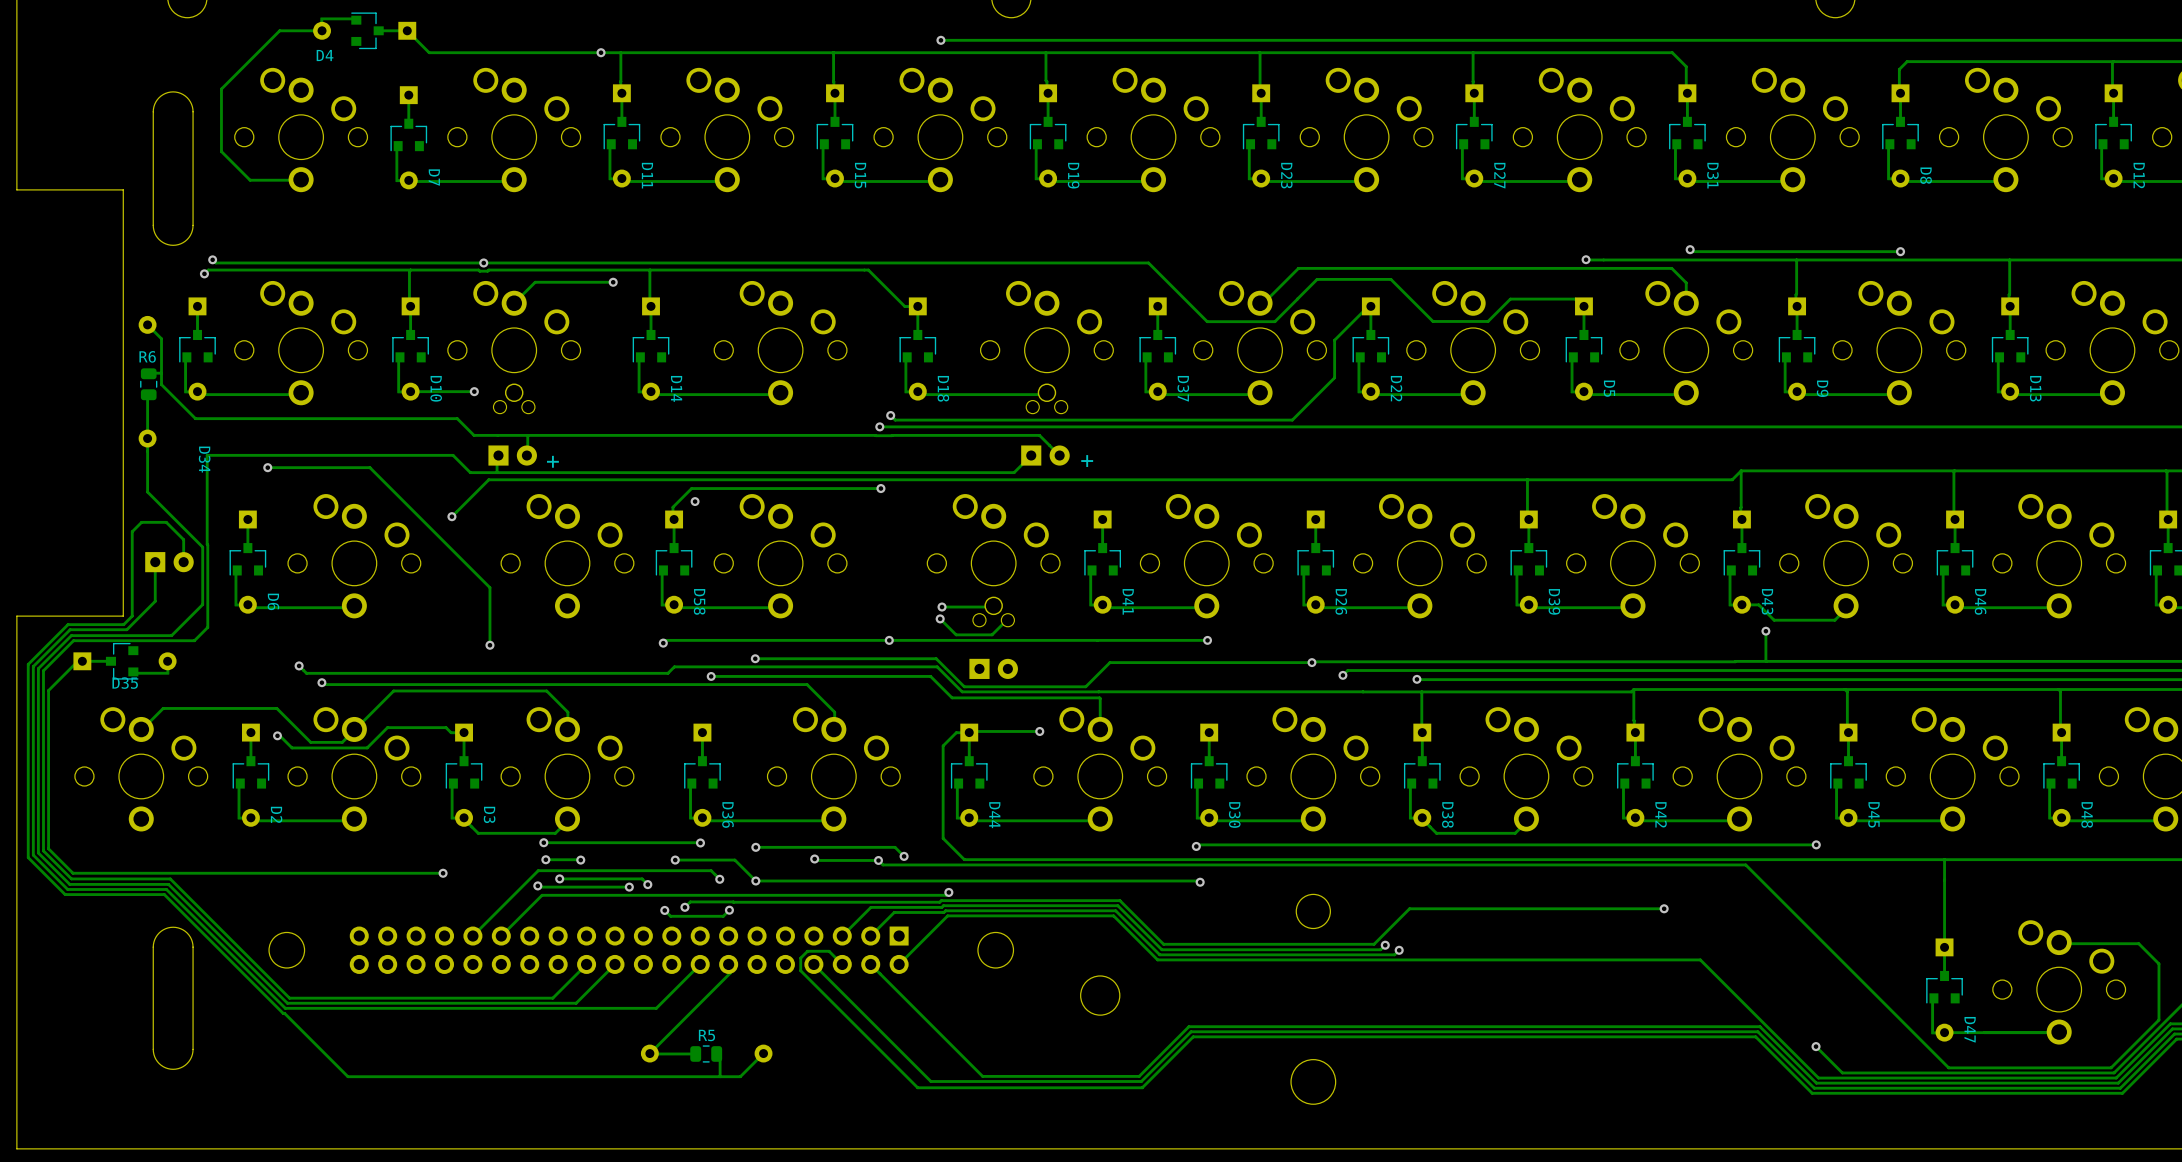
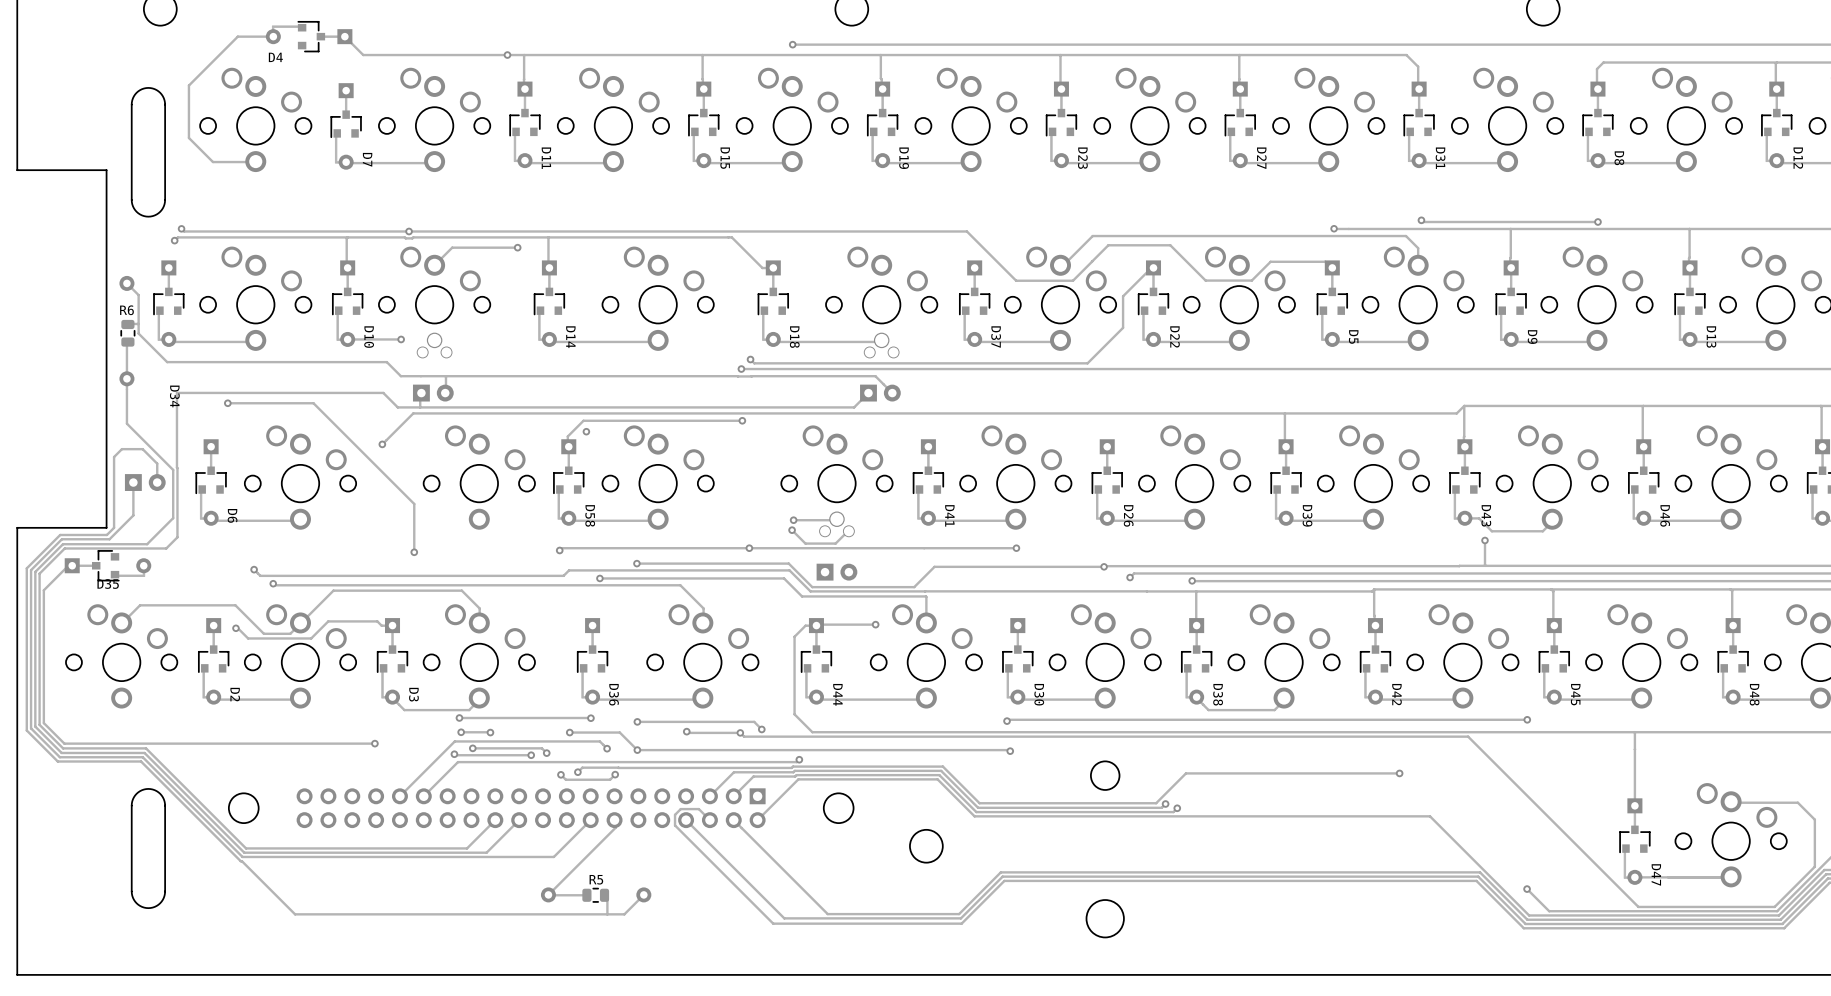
text: + (552, 461) -> none
text: + (1087, 461) -> none

